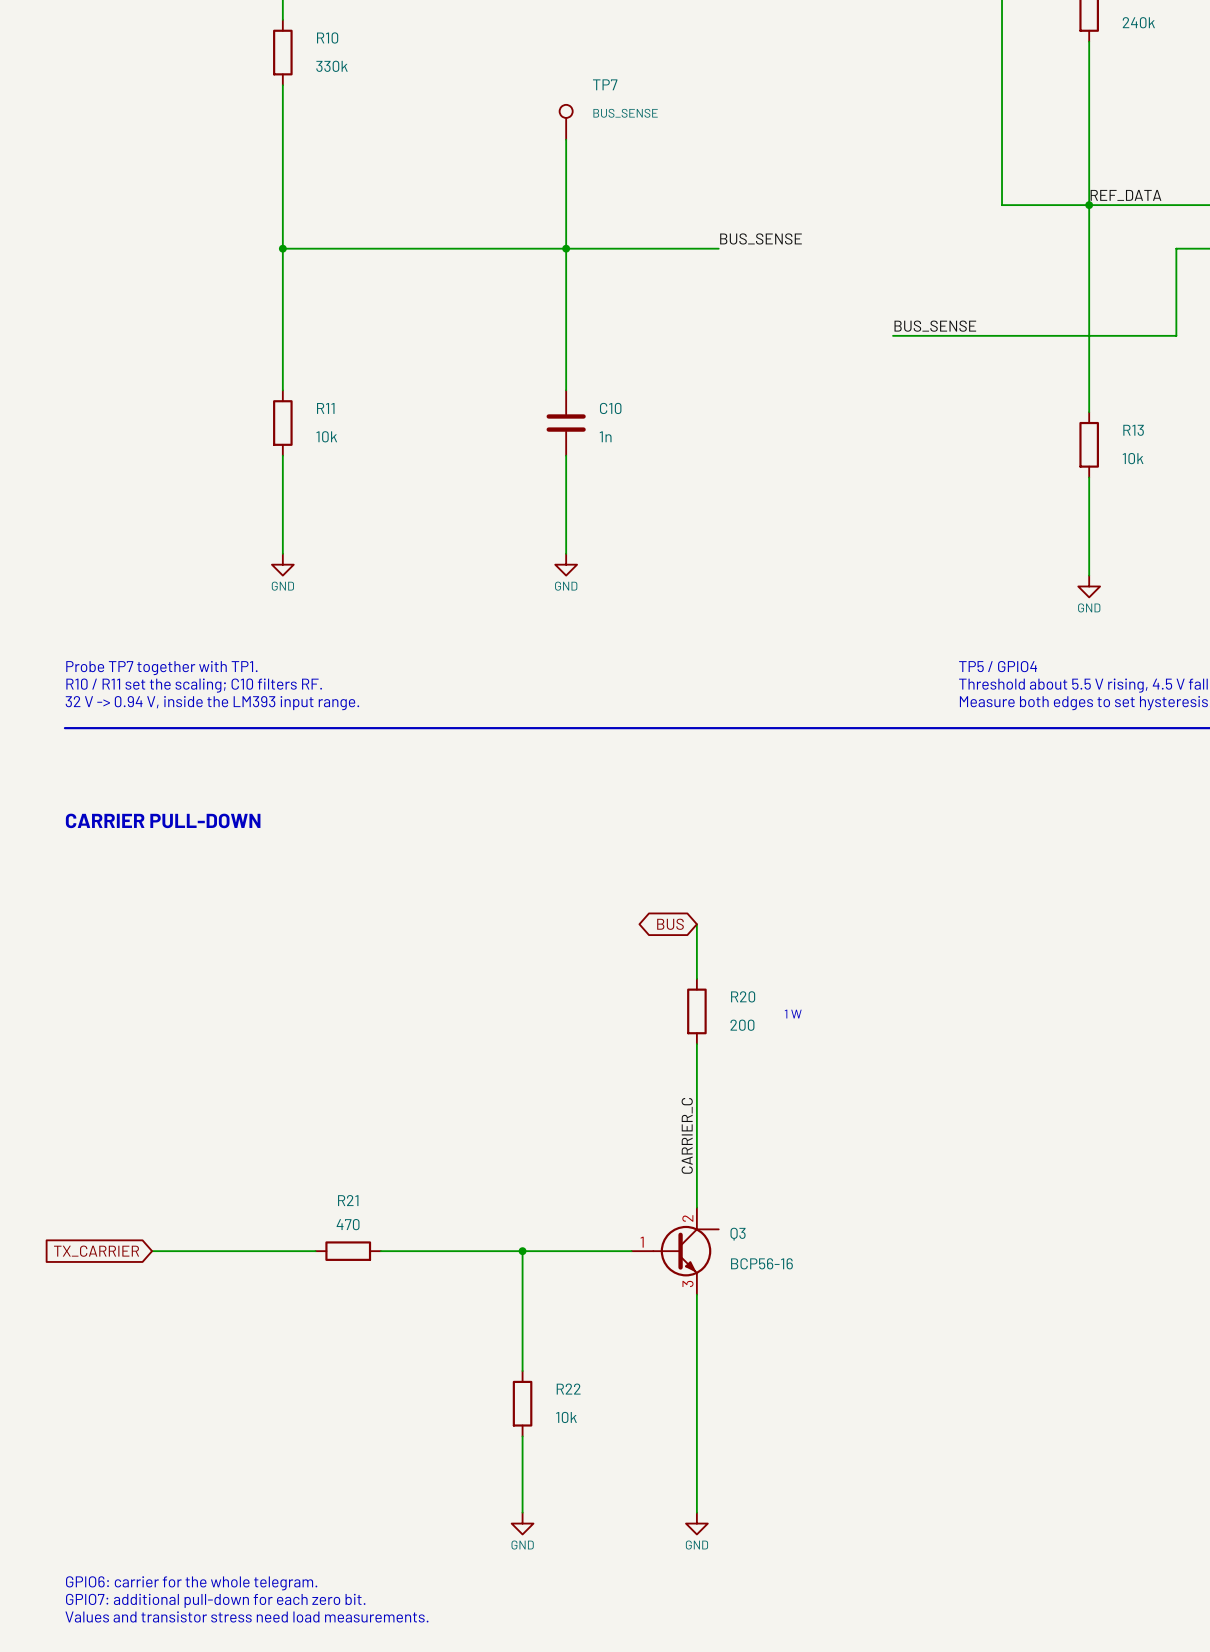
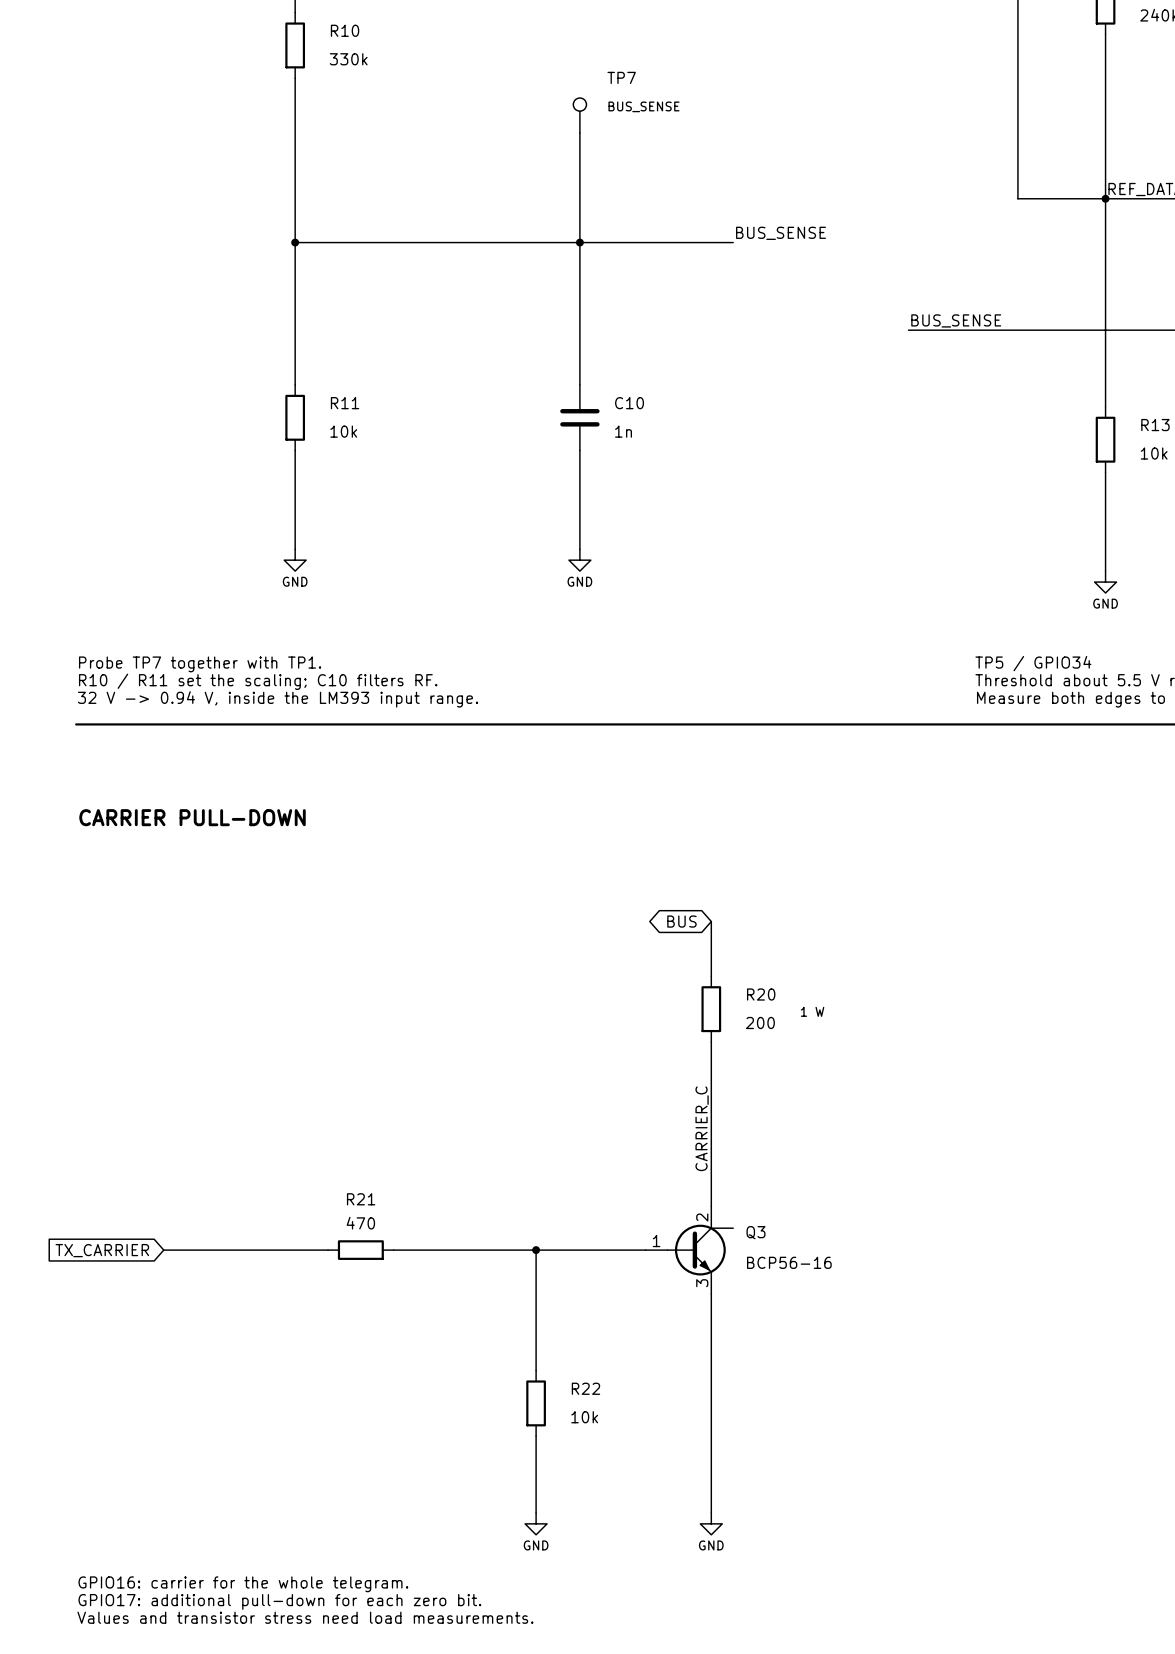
text: TP5 / GPIO4 (998, 666) -> TP5 / GPIO34 (1033, 663)
text: GPIO6: carrier for the whole telegram. (191, 1583) -> GPIO16: carrier for the whole telegram. (243, 1584)
text: GPIO7: additional pull-down for each zero bit. (215, 1600) -> GPIO17: additional pull-down for each zero bit. (279, 1601)

